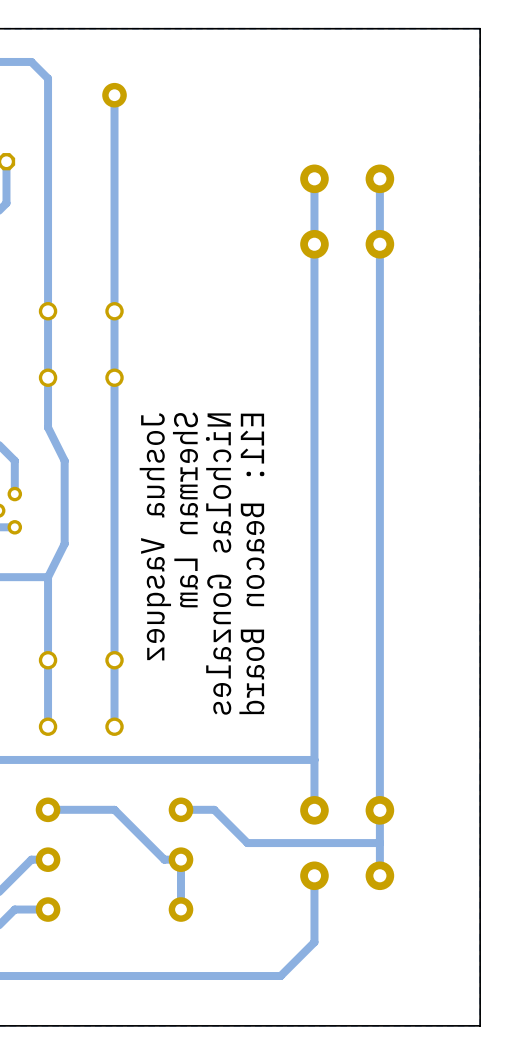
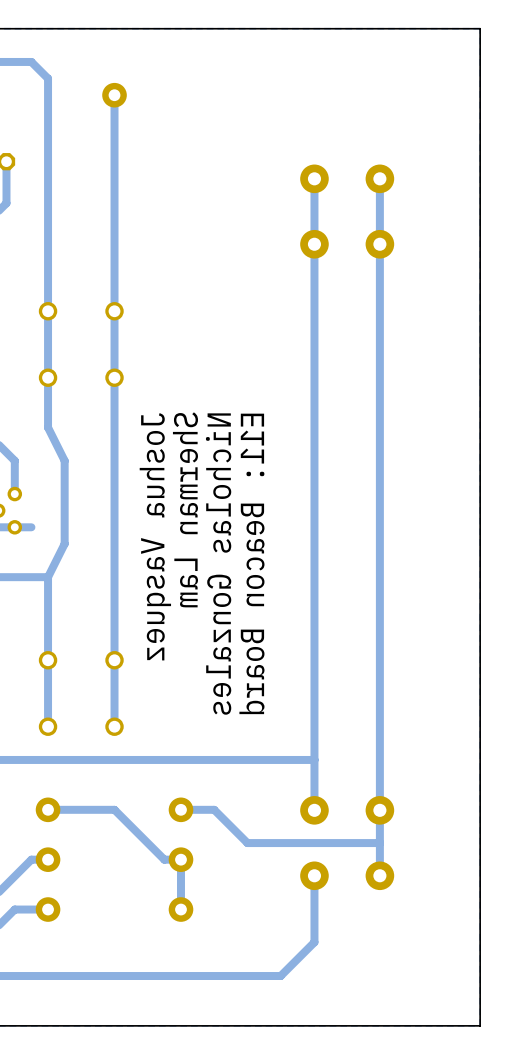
track: none -> (31, 527) (14, 527)

